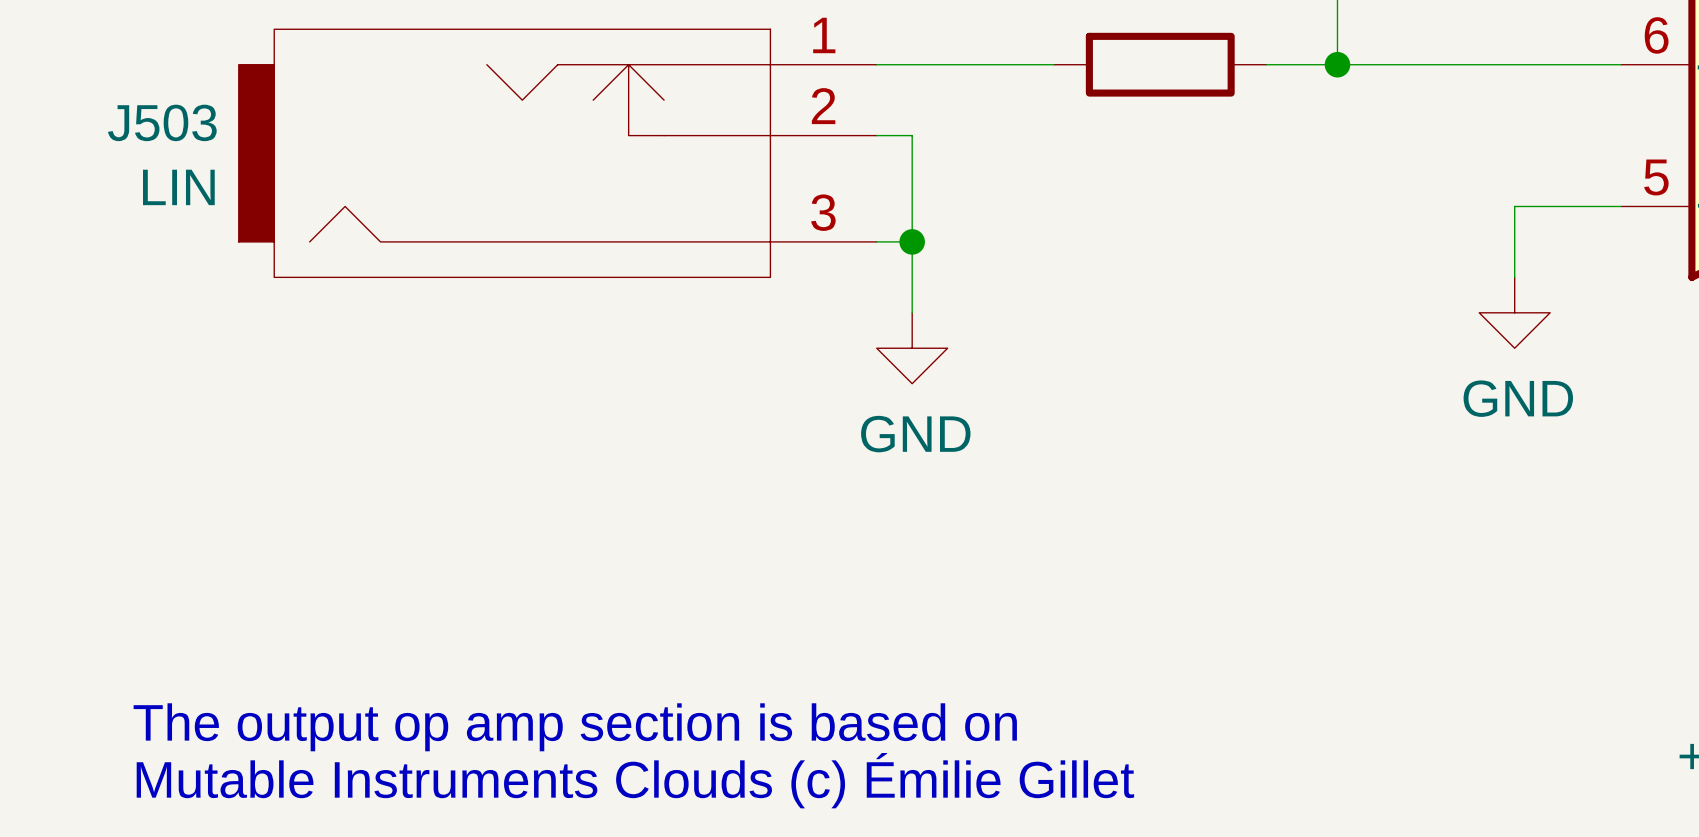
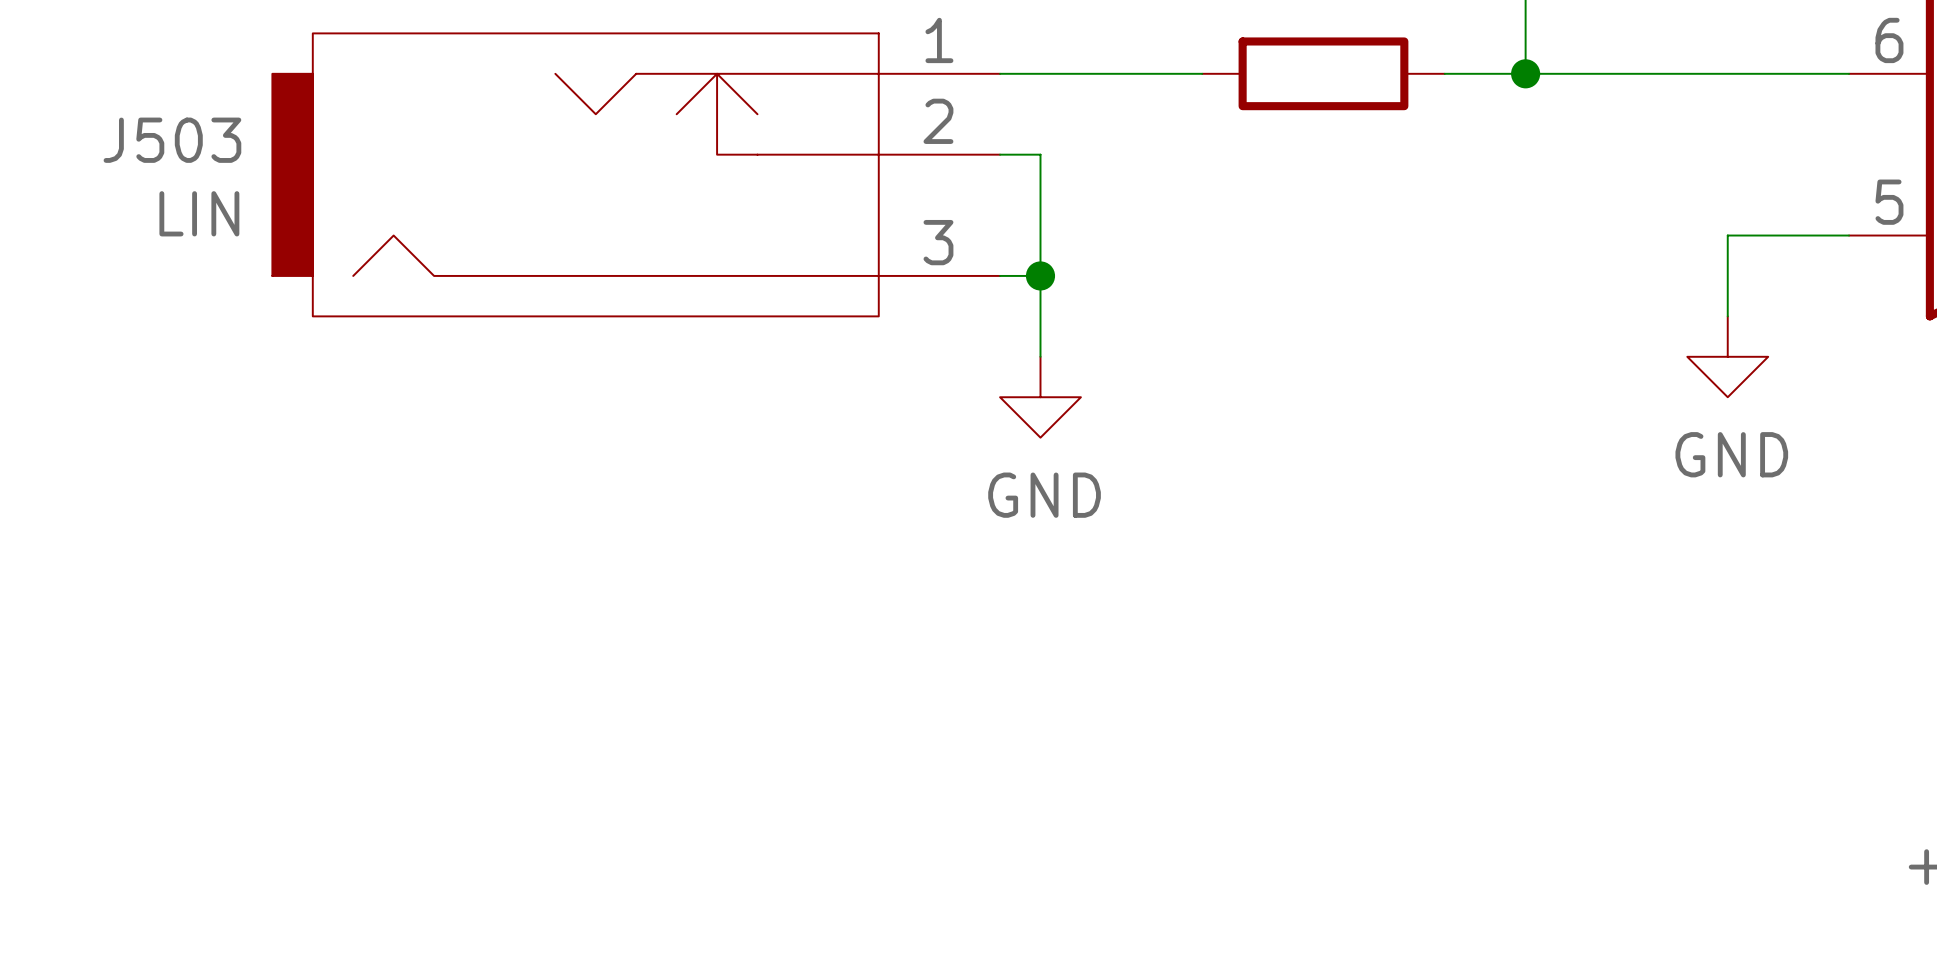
text: The output op amp section is based on (575, 727) -> none
text: Mutable Instruments Clouds (c) Émilie Gillet (635, 780) -> none

